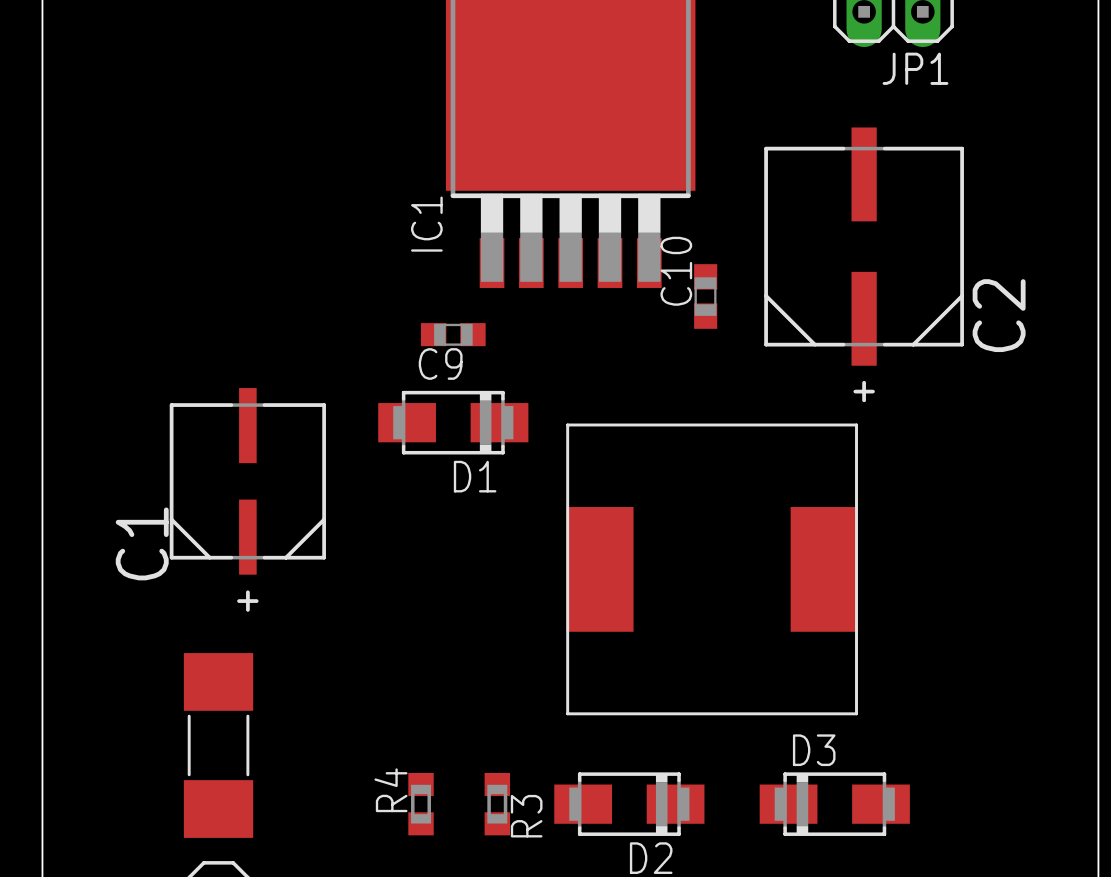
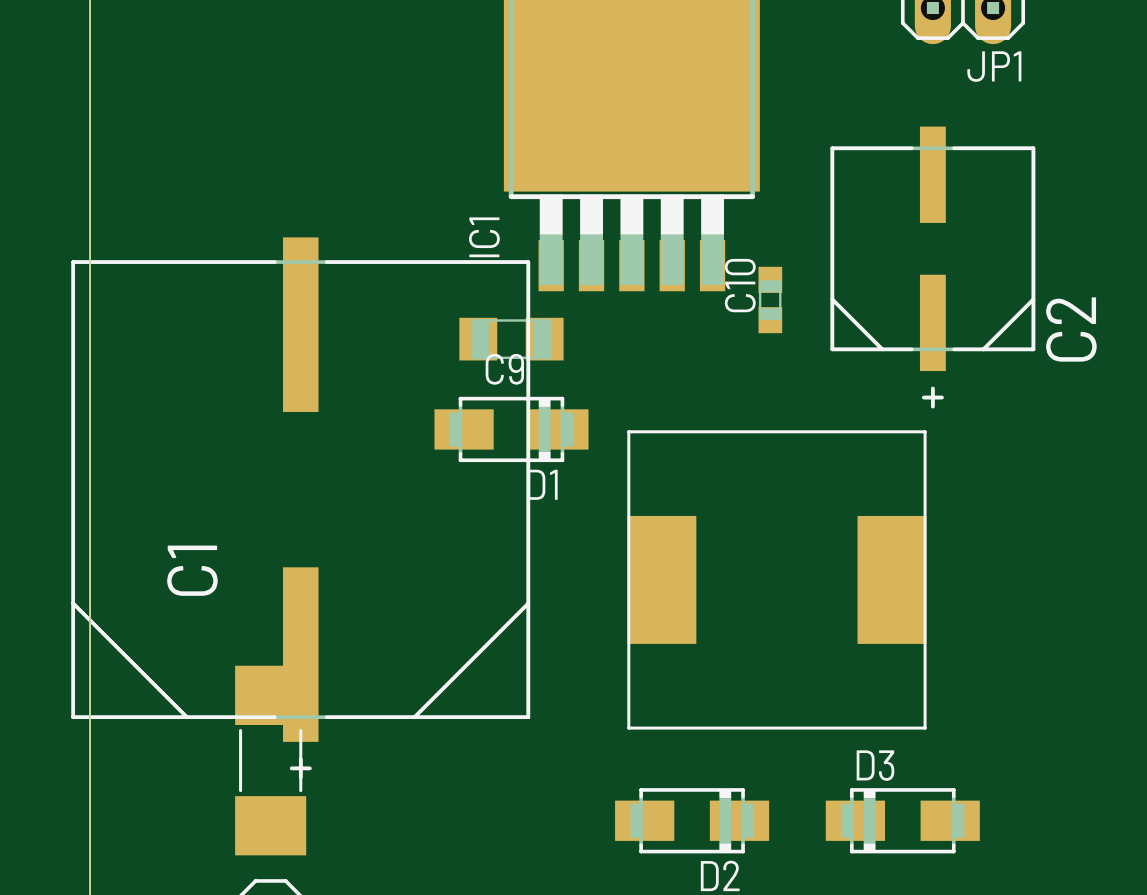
C9 footprint: [420, 323, 486, 347] -> [459, 317, 564, 361]
C1 footprint: [169, 388, 326, 612] -> [71, 237, 531, 780]
R4: (421, 804) -> none
R3: (497, 804) -> none

